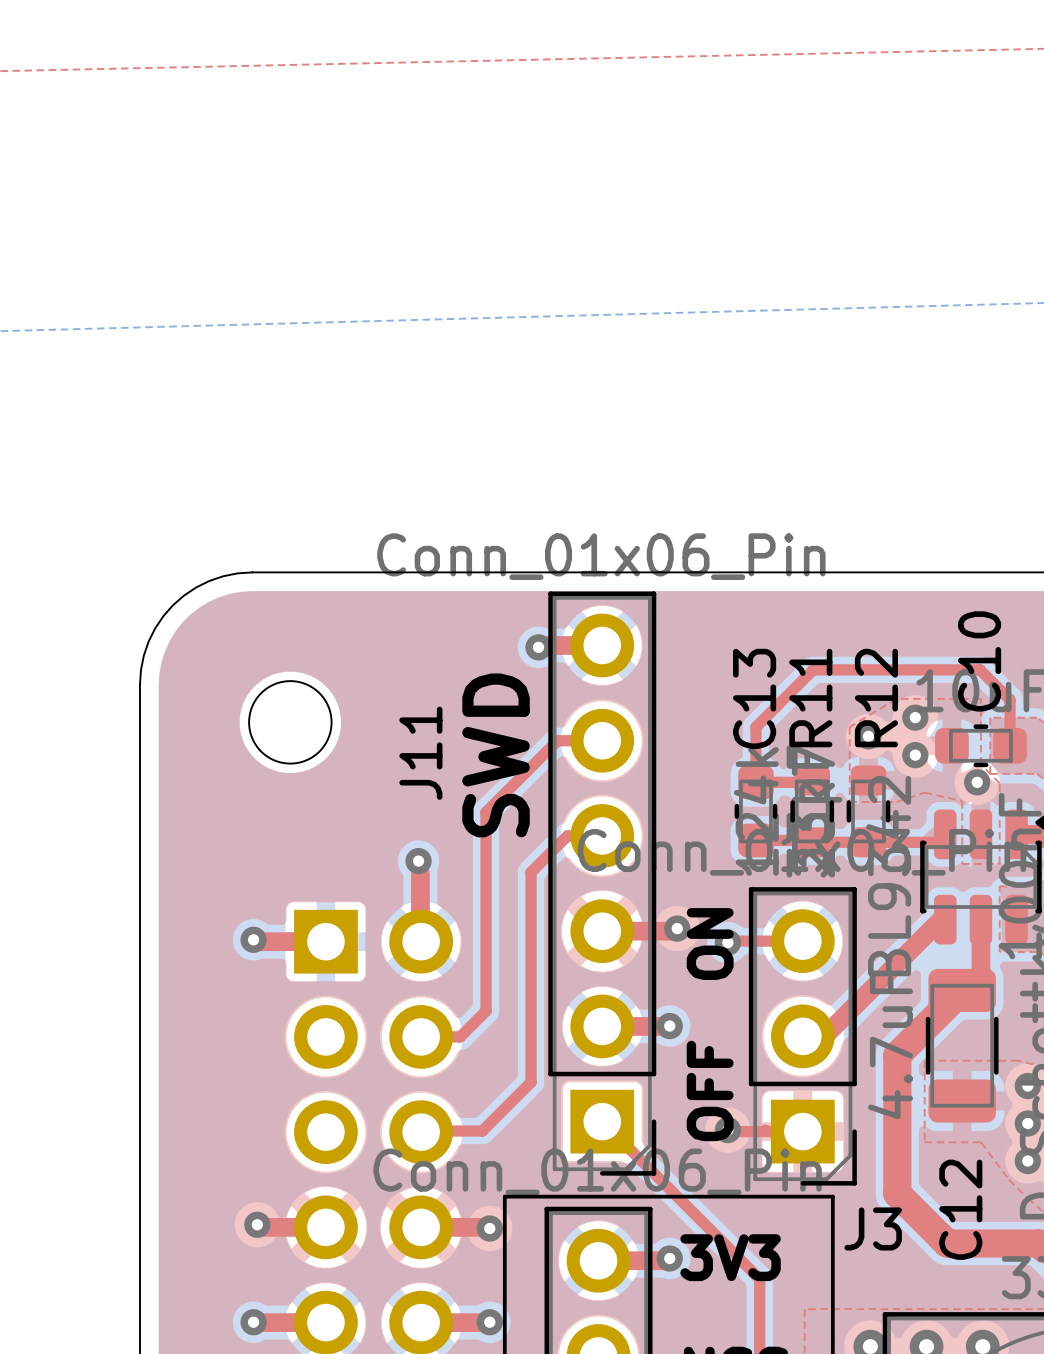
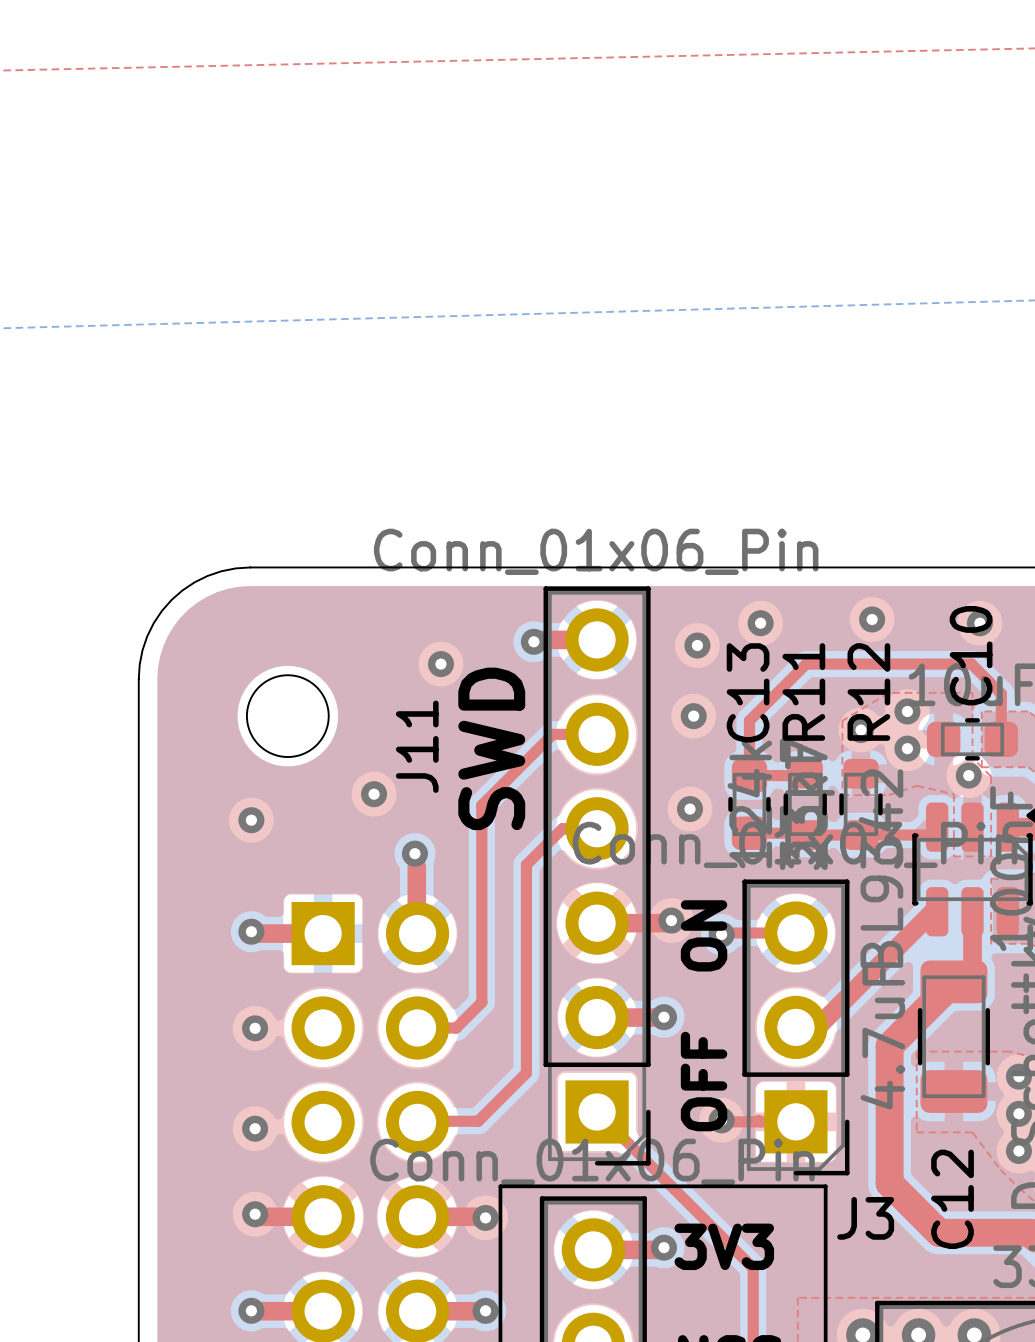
via: none -> (872, 619)
via: none -> (760, 623)
via: none -> (979, 623)
via: none -> (697, 645)
via: none -> (440, 664)
via: none -> (693, 716)
via: none -> (374, 794)
via: none -> (690, 809)
via: none -> (251, 820)
via: none -> (255, 1028)
via: none -> (255, 1128)

